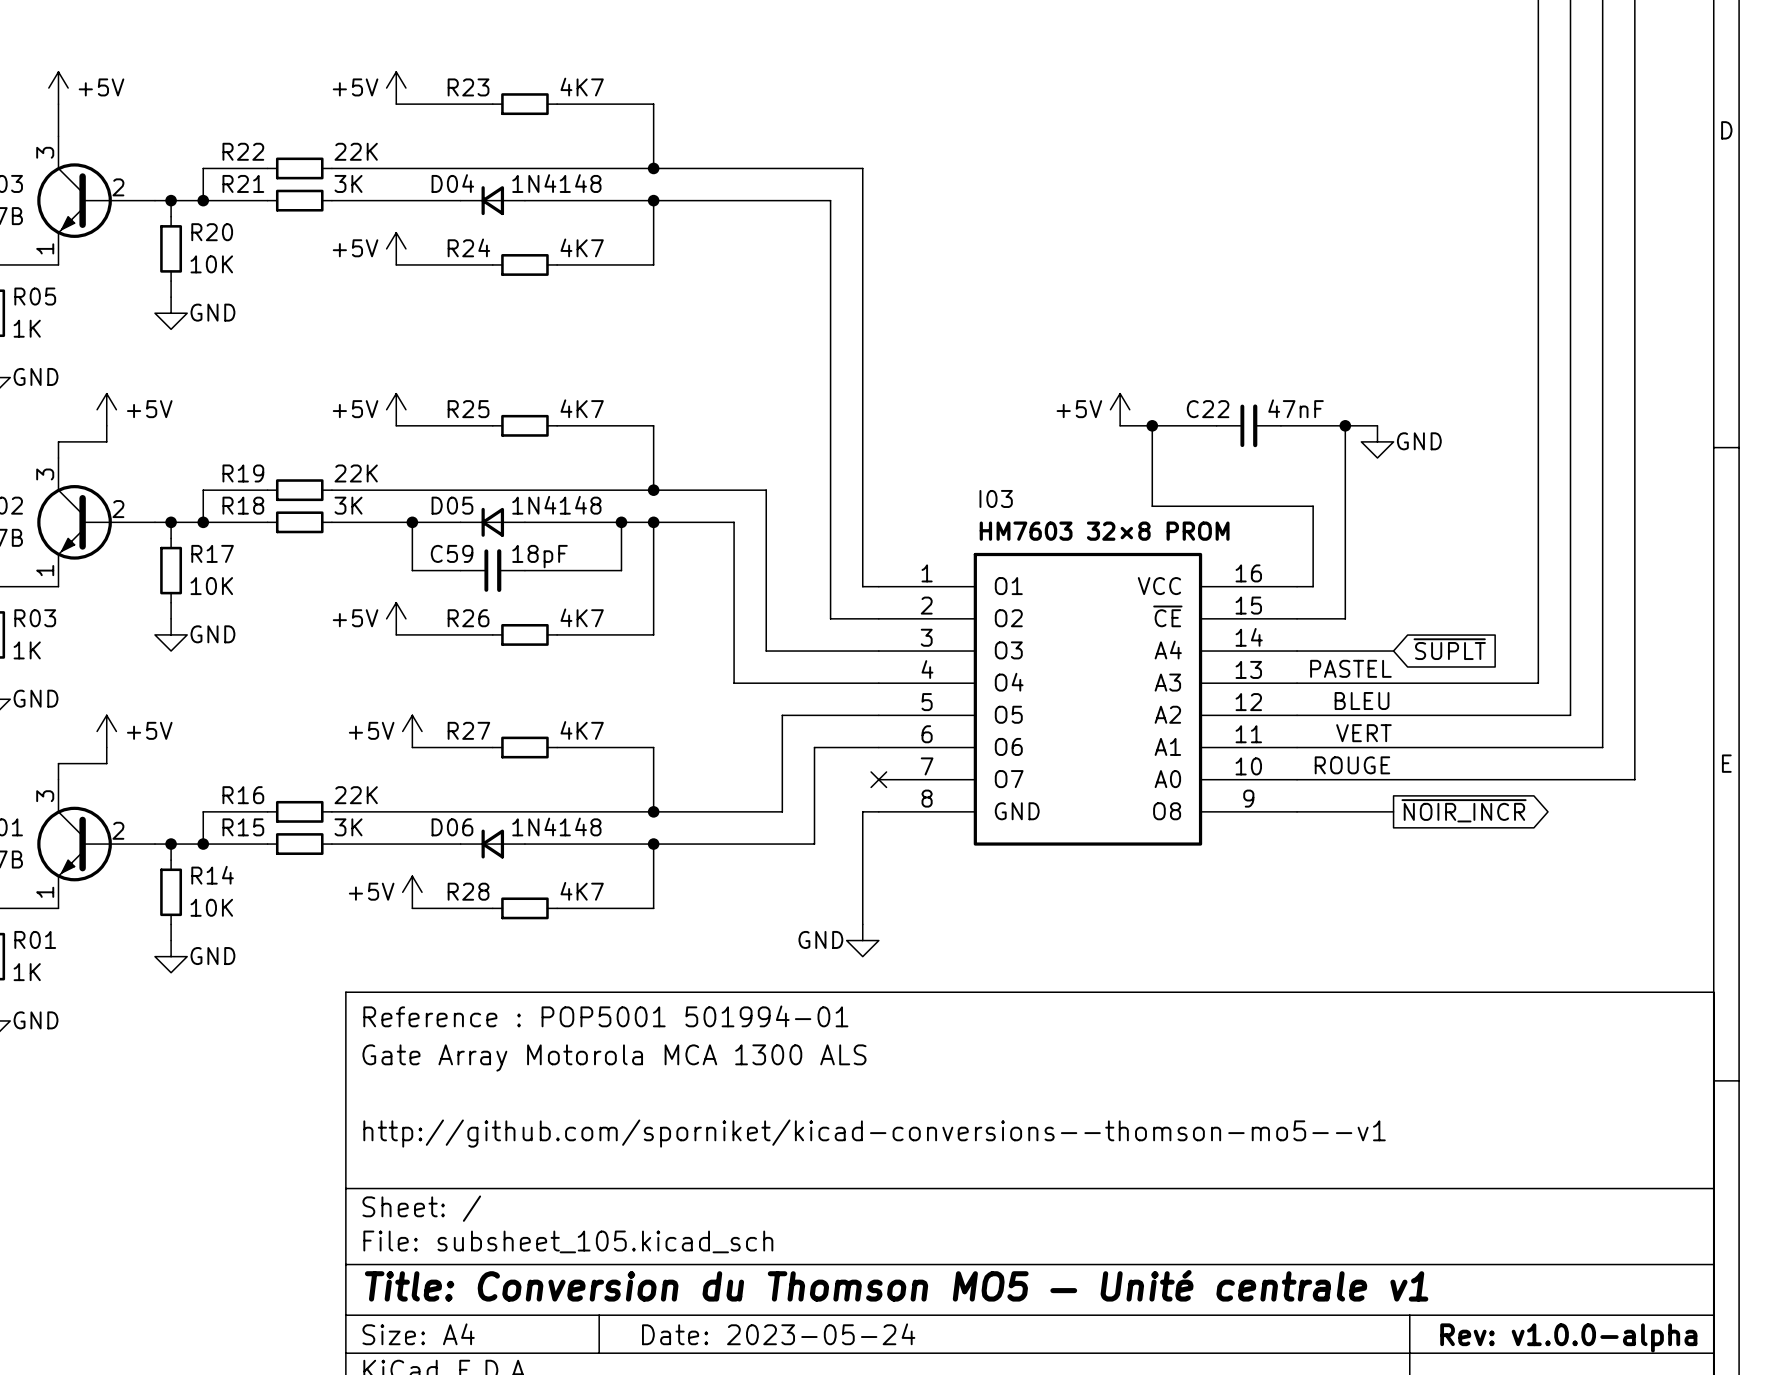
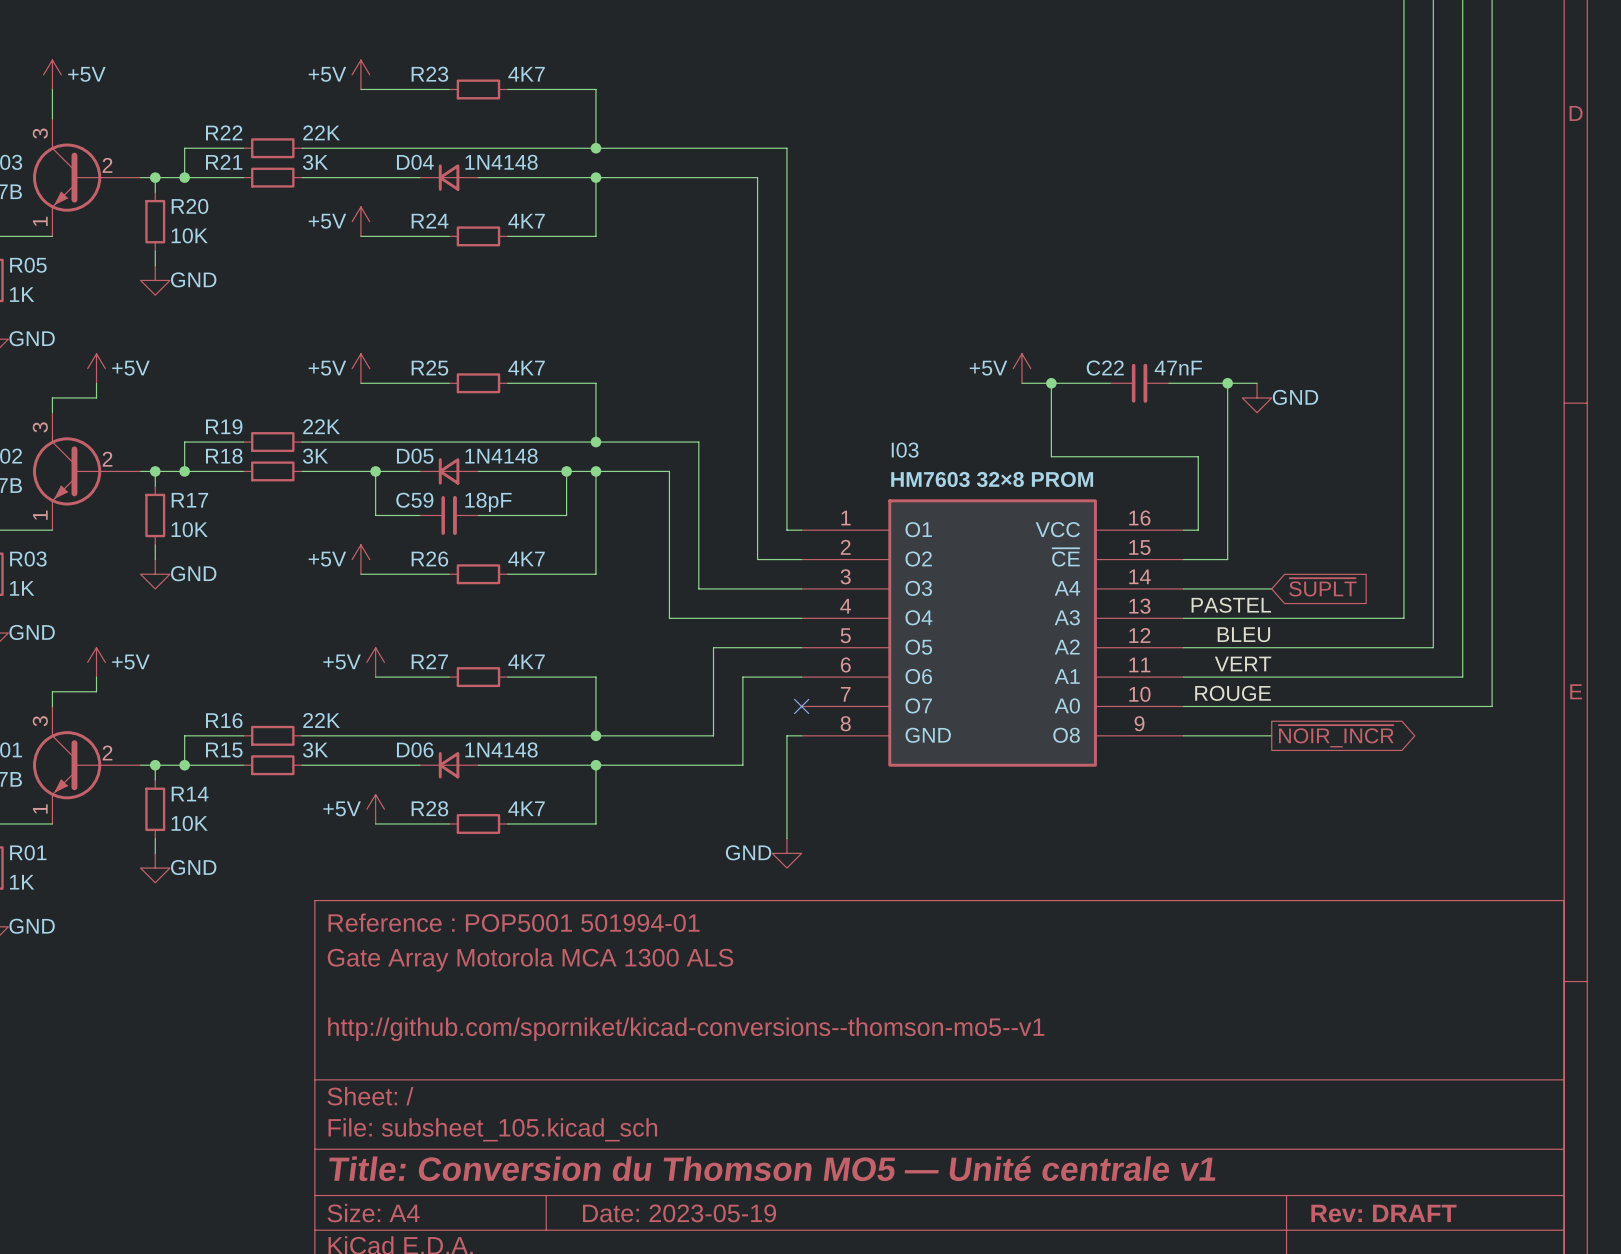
title block: Date: 2023-05-24 (778, 1334) -> Date: 2023-05-19 (679, 1213)
title block: Rev: v1.0.0-alpha (1568, 1337) -> Rev: DRAFT (1383, 1213)

